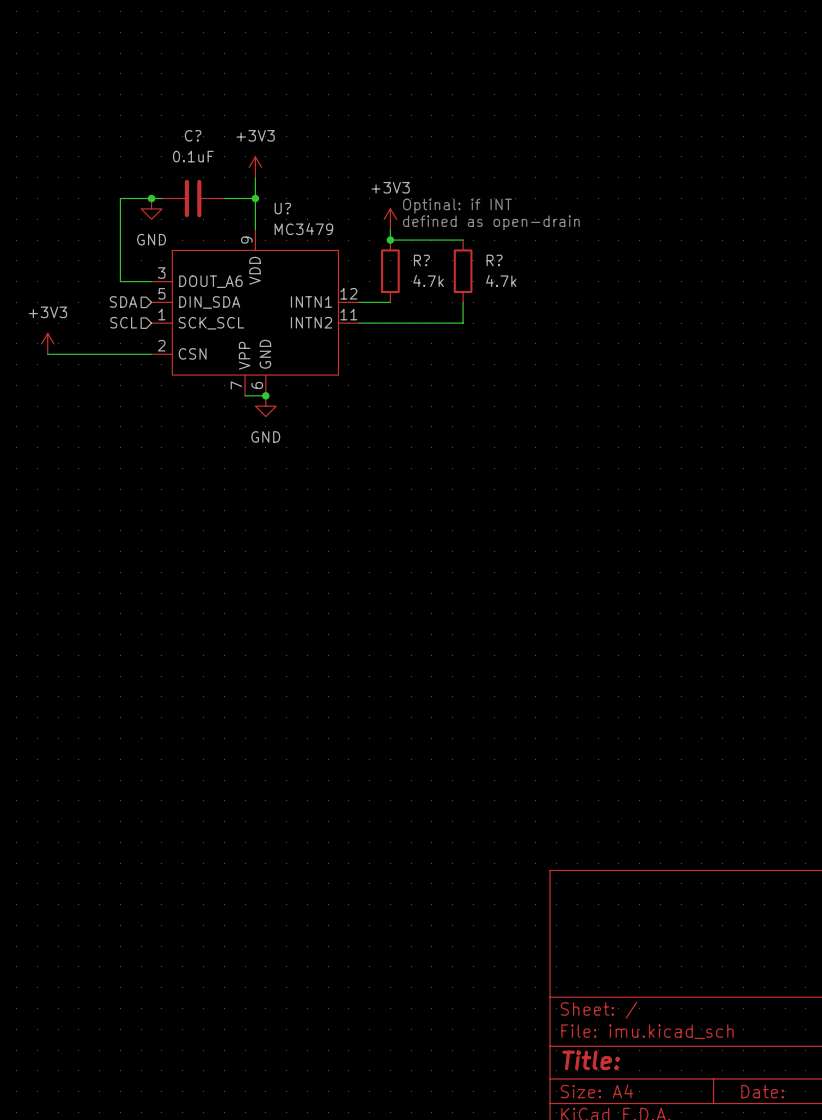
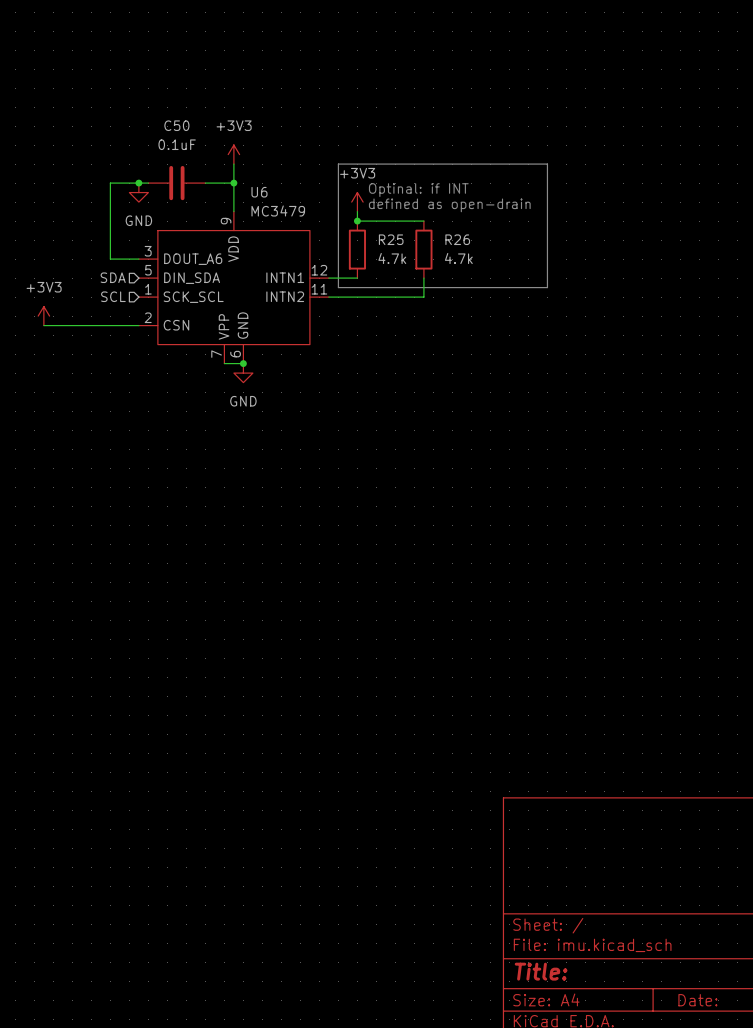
C? name: C? (193, 135) -> C50 (176, 125)
line: none -> (338, 164) (547, 164) (547, 287) (338, 287) (338, 164)
U? name: U? (282, 208) -> U6 (259, 192)
R? name: R? (421, 260) -> R25 (391, 239)
R? name: R? (494, 260) -> R26 (457, 239)

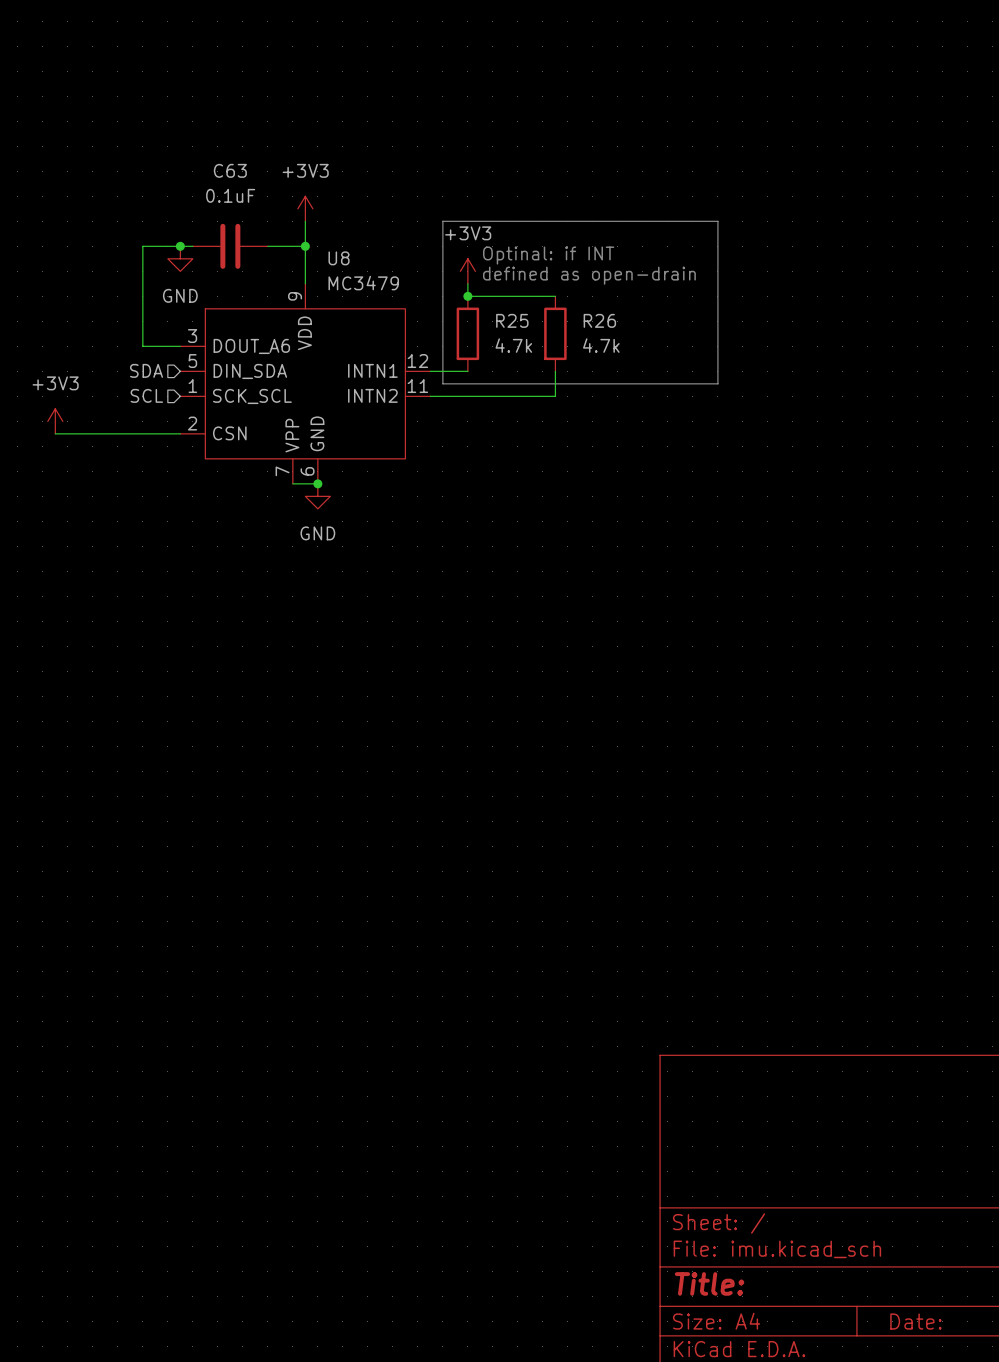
C50 name: C50 (176, 125) -> C63 (230, 170)
U6 name: U6 (259, 192) -> U8 (339, 258)

